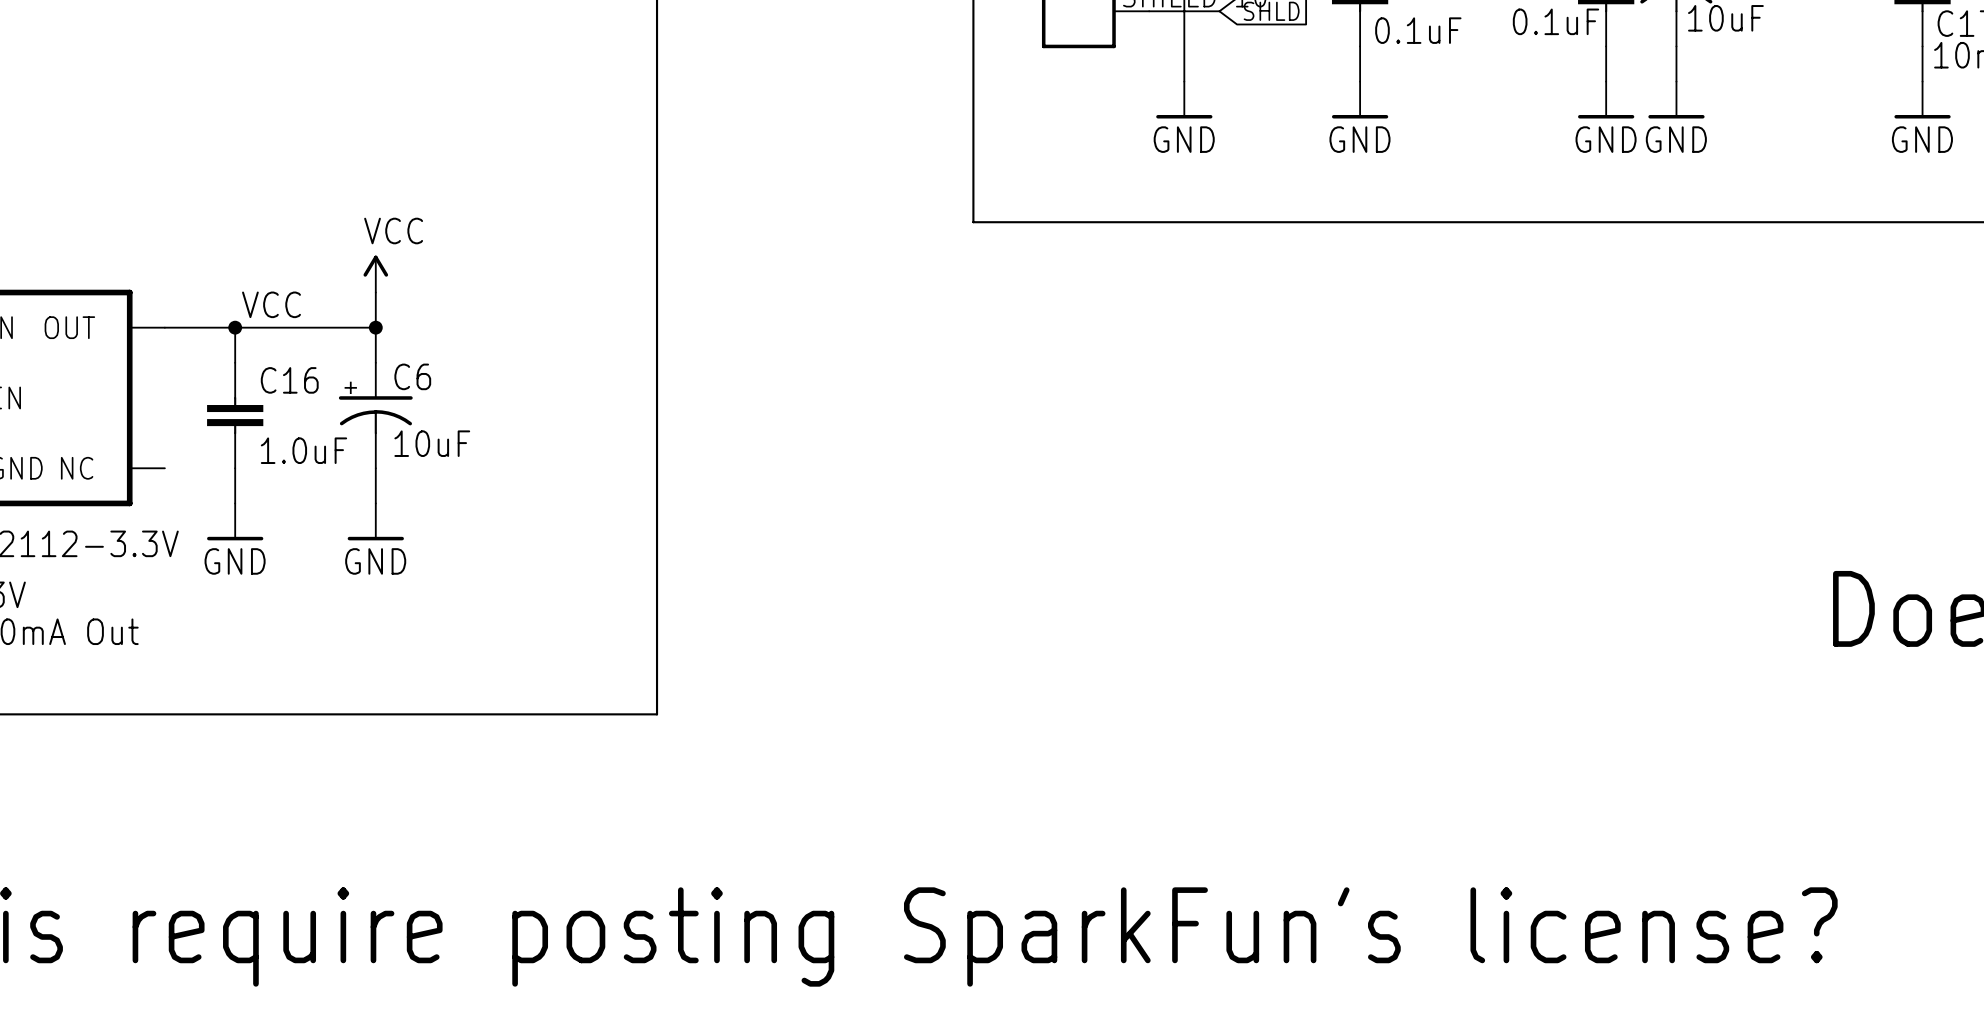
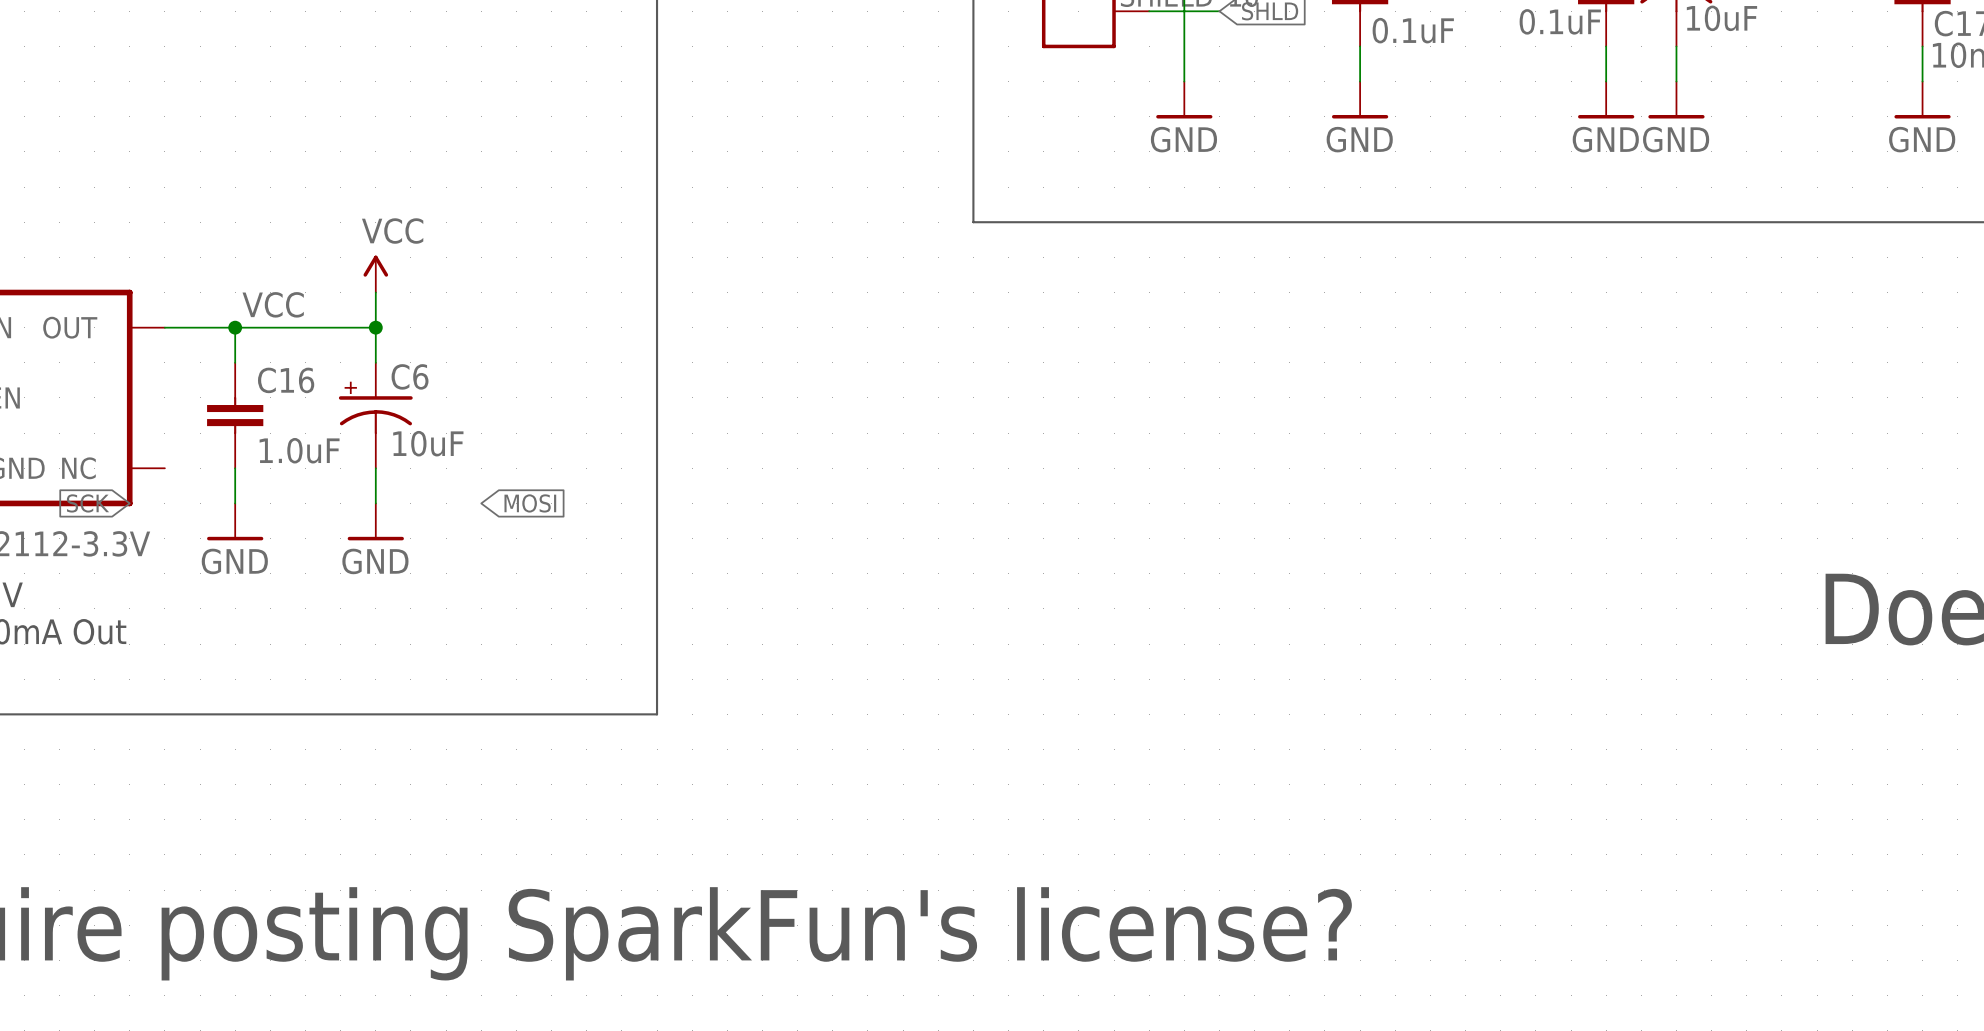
global label: none -> SCK (88, 503)
global label: none -> MOSI (530, 503)

